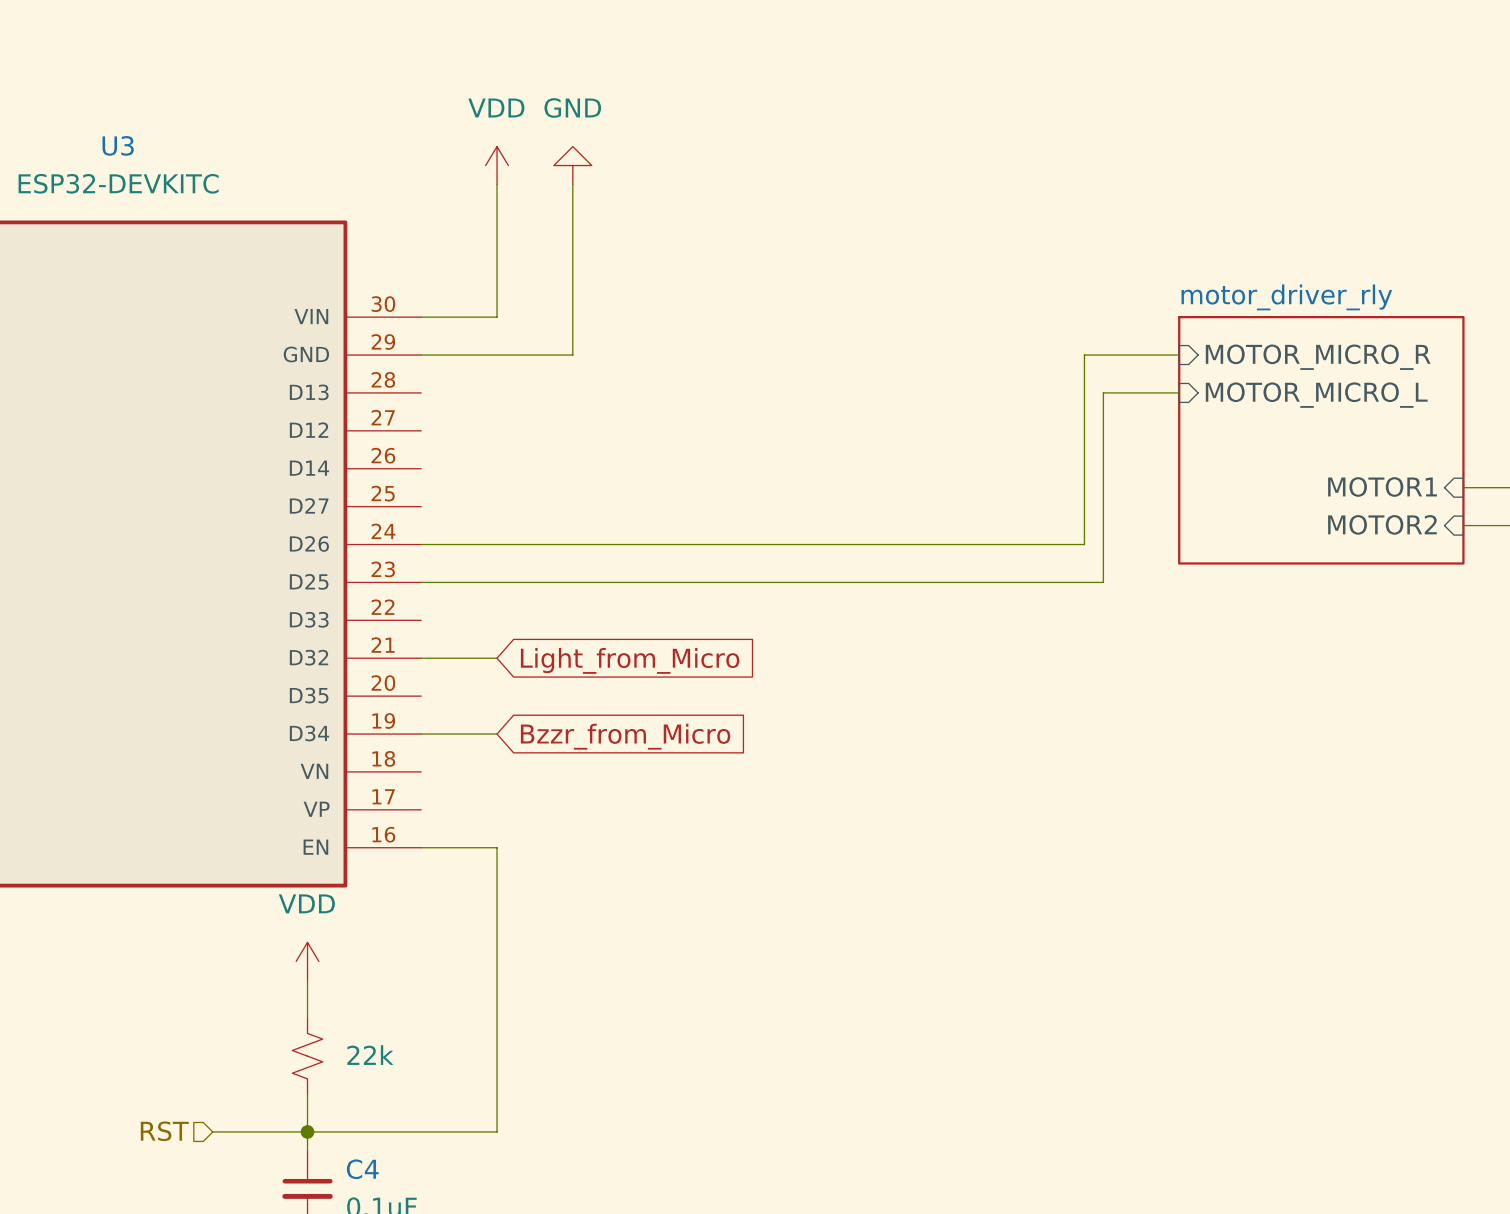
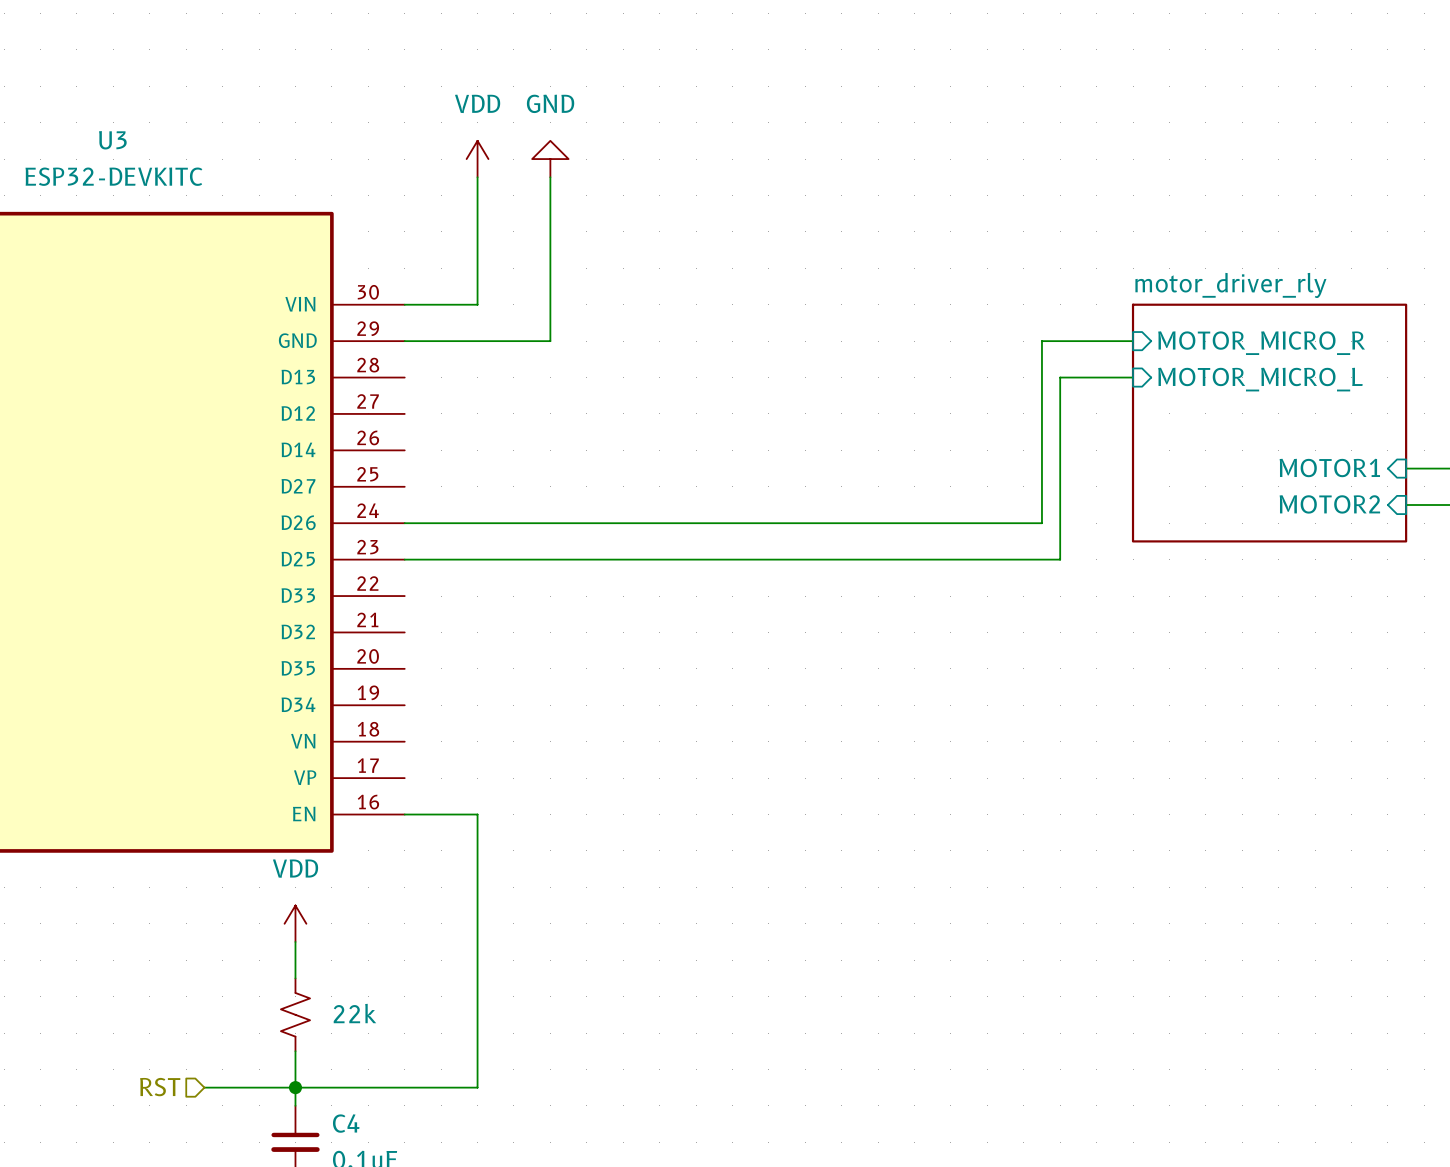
wire: (421, 658) (497, 658) -> none
global label: Light_from_Micro (630, 660) -> none
wire: (421, 734) (497, 734) -> none
global label: Bzzr_from_Micro (625, 736) -> none

